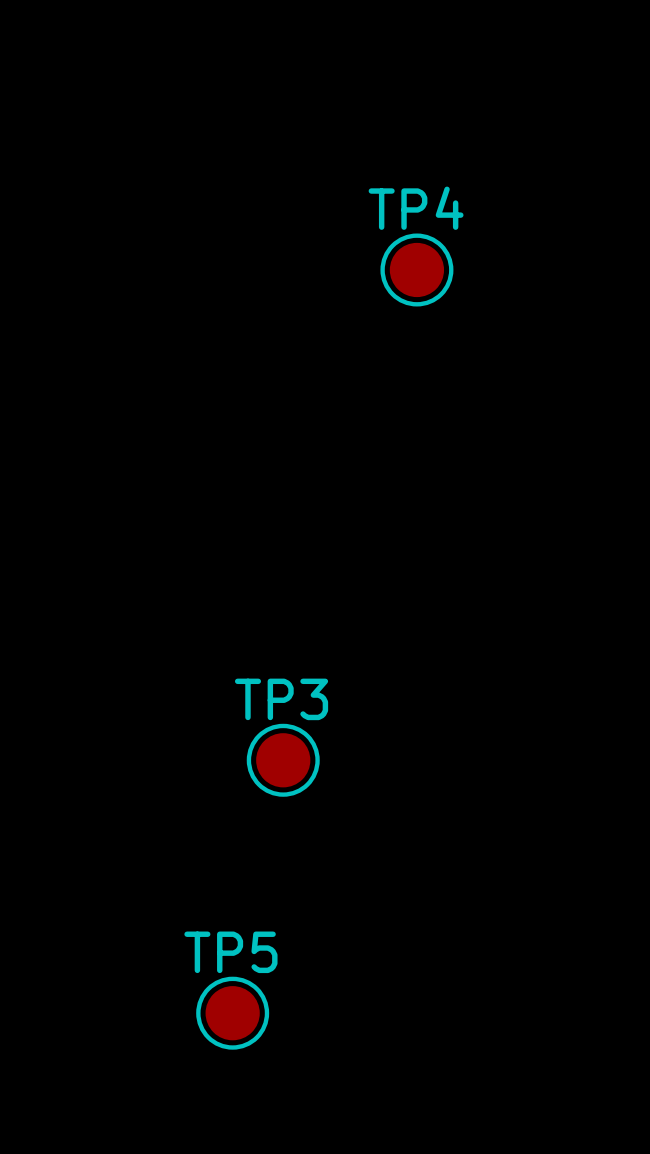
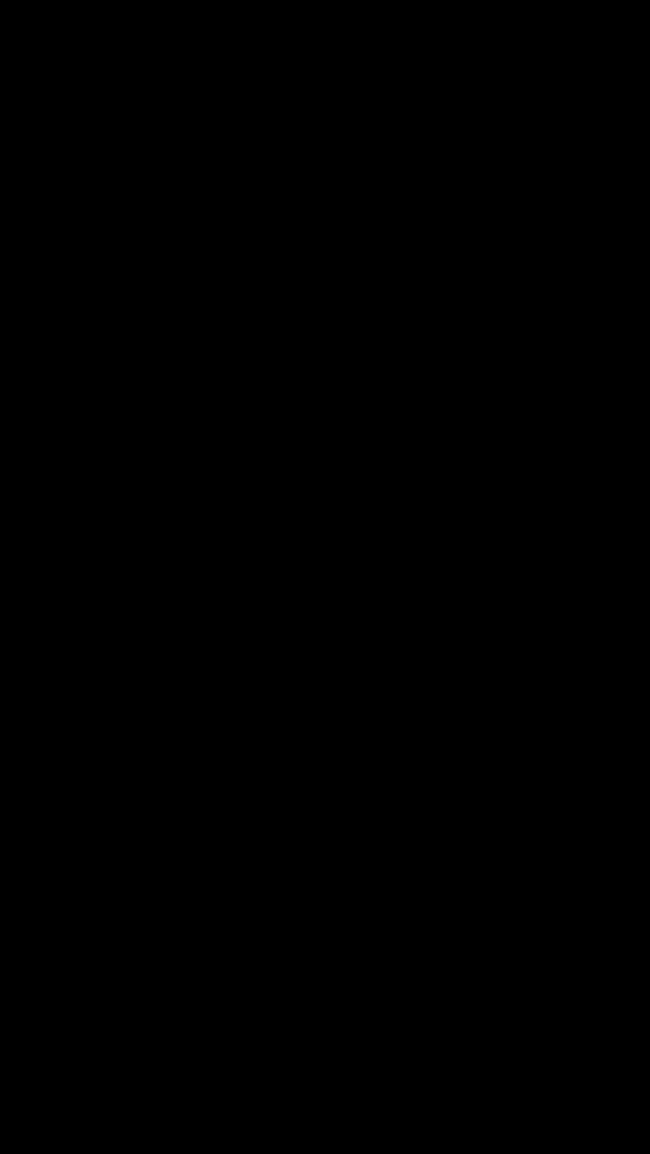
TP4: (416, 269) -> none
TP3: (283, 760) -> none
TP5: (232, 1013) -> none

